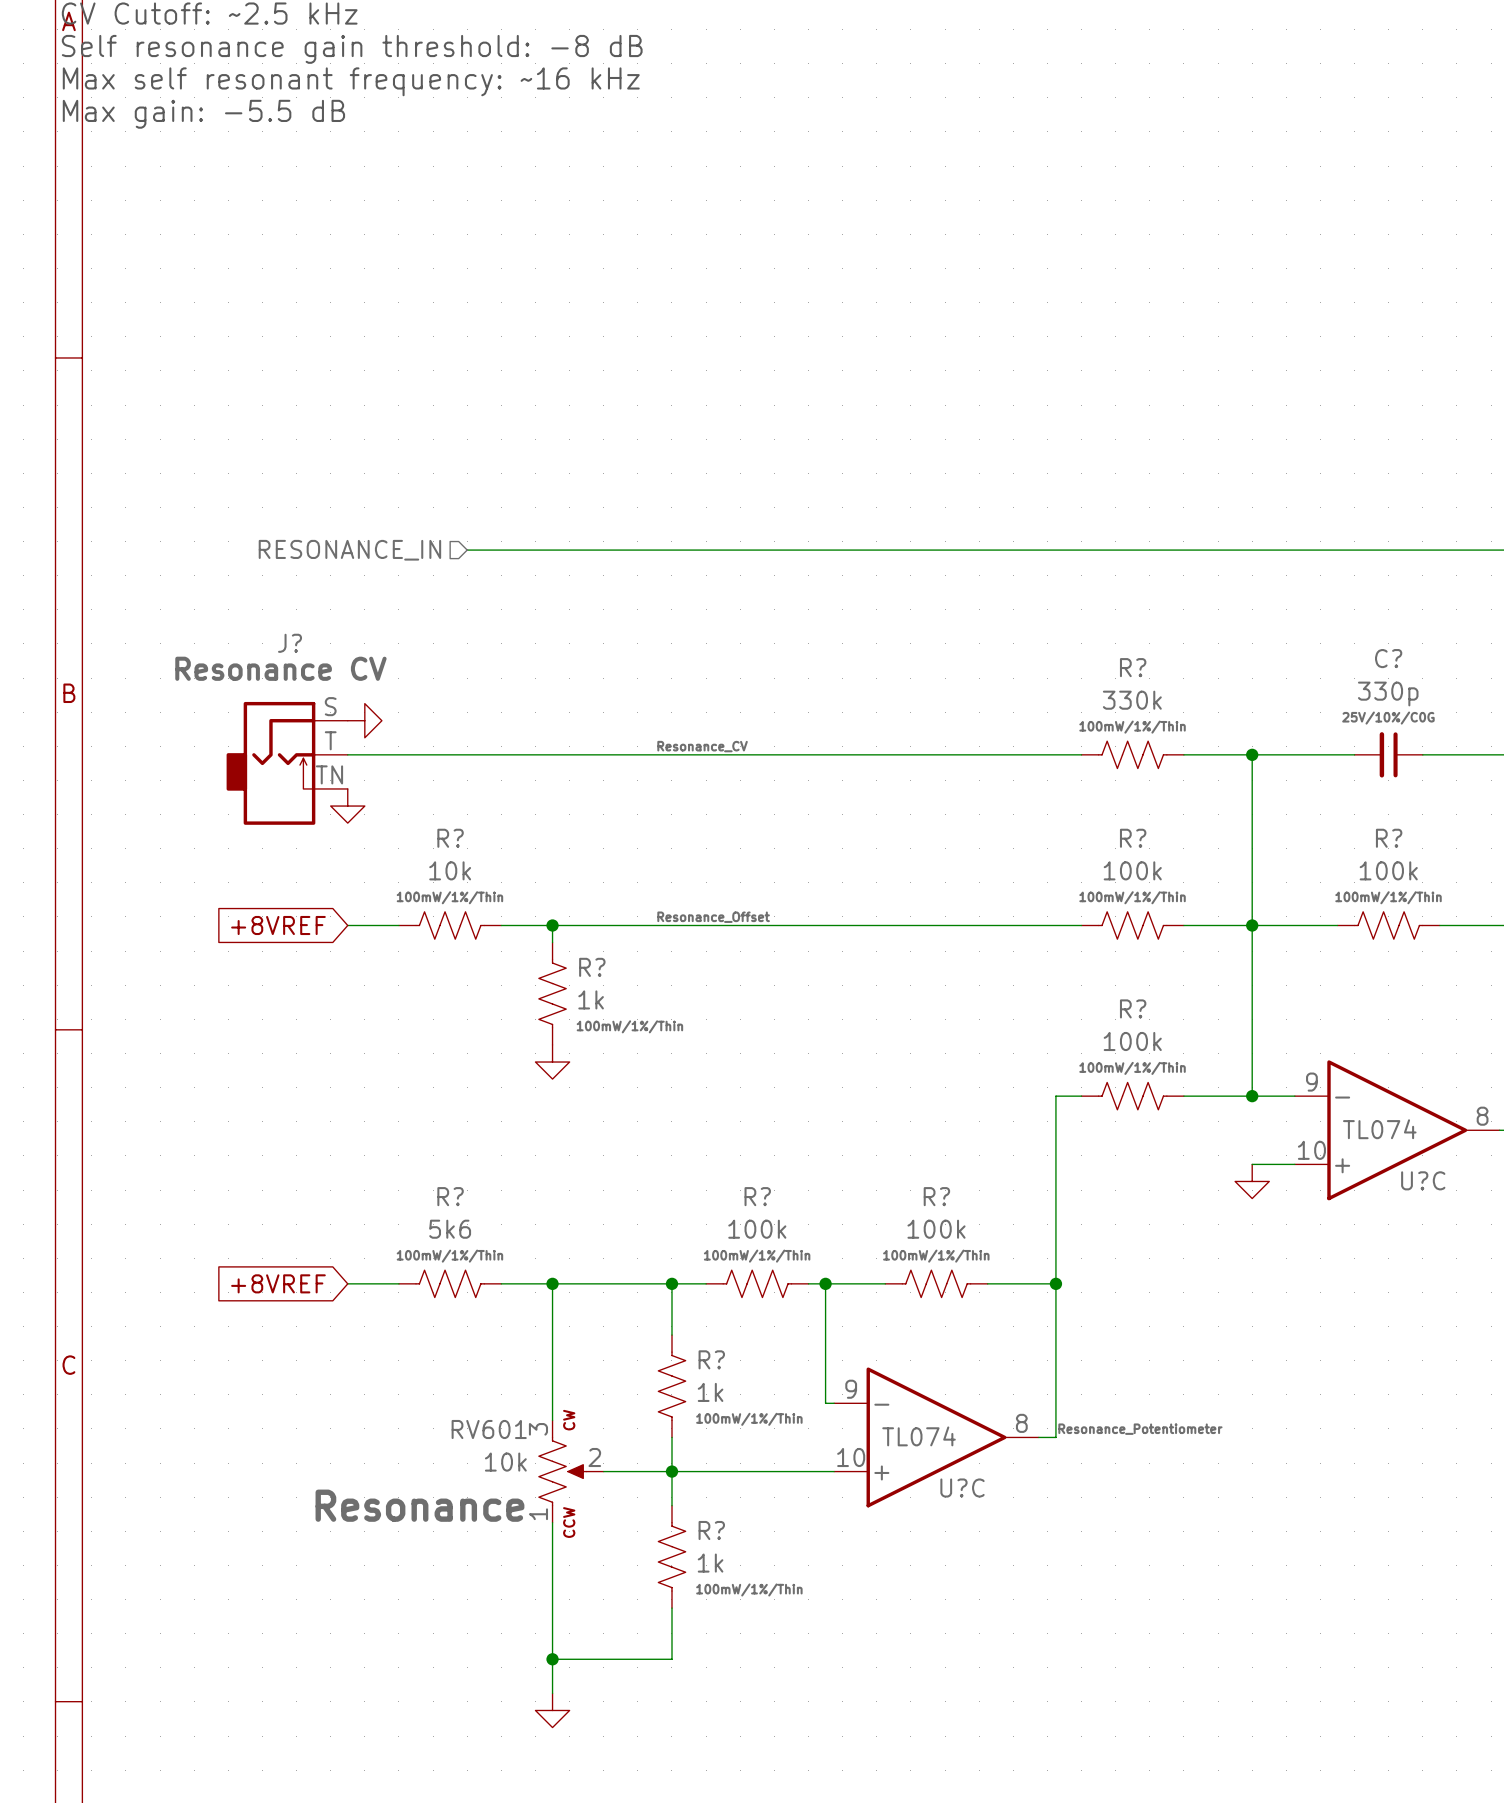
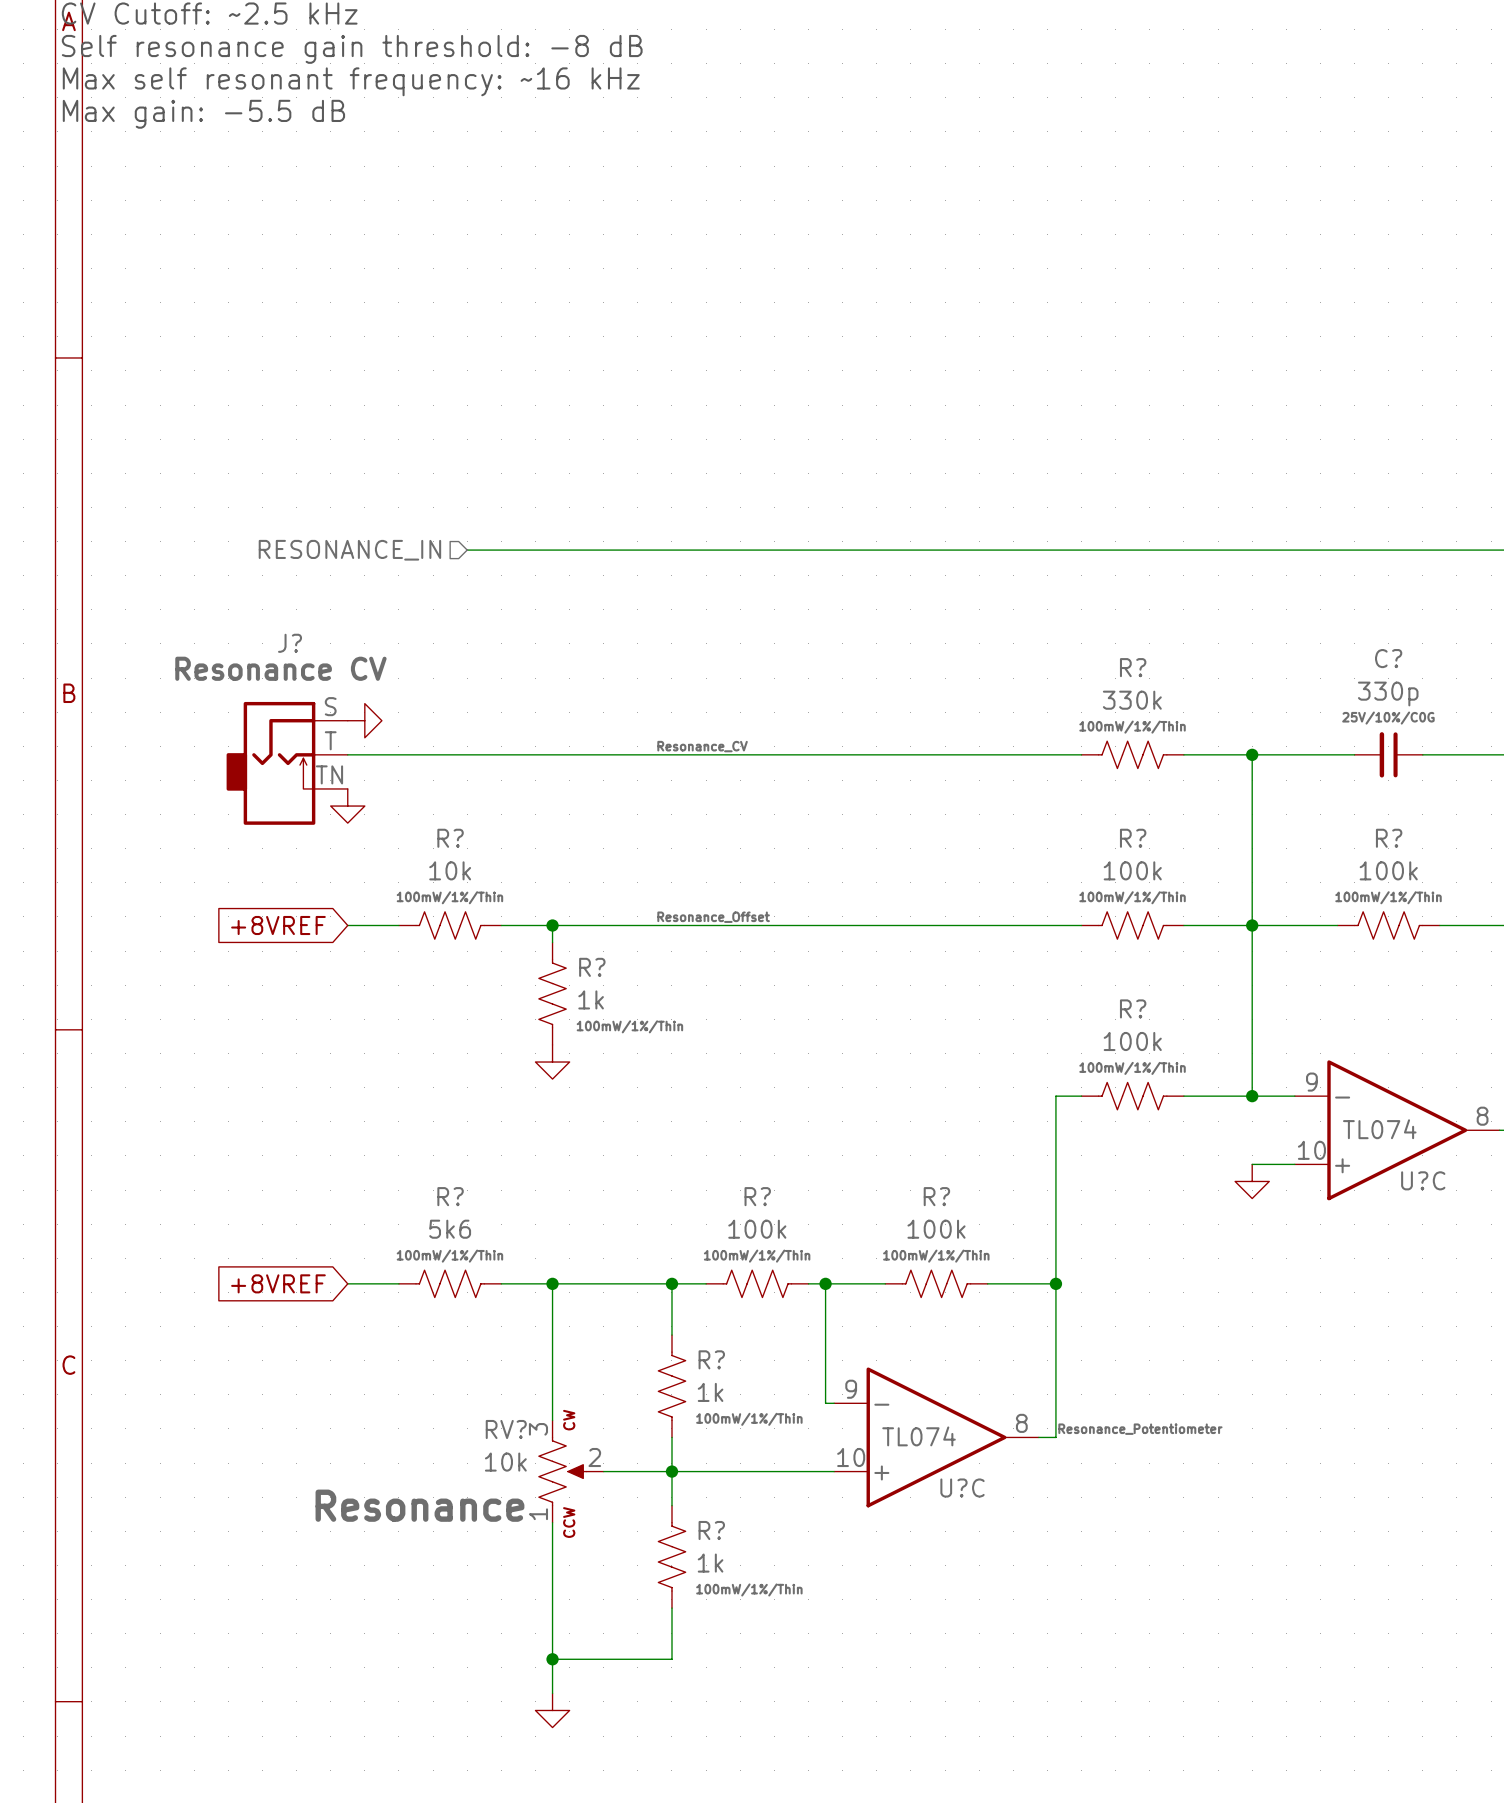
RV601 name: RV601 (489, 1429) -> RV? (506, 1429)

